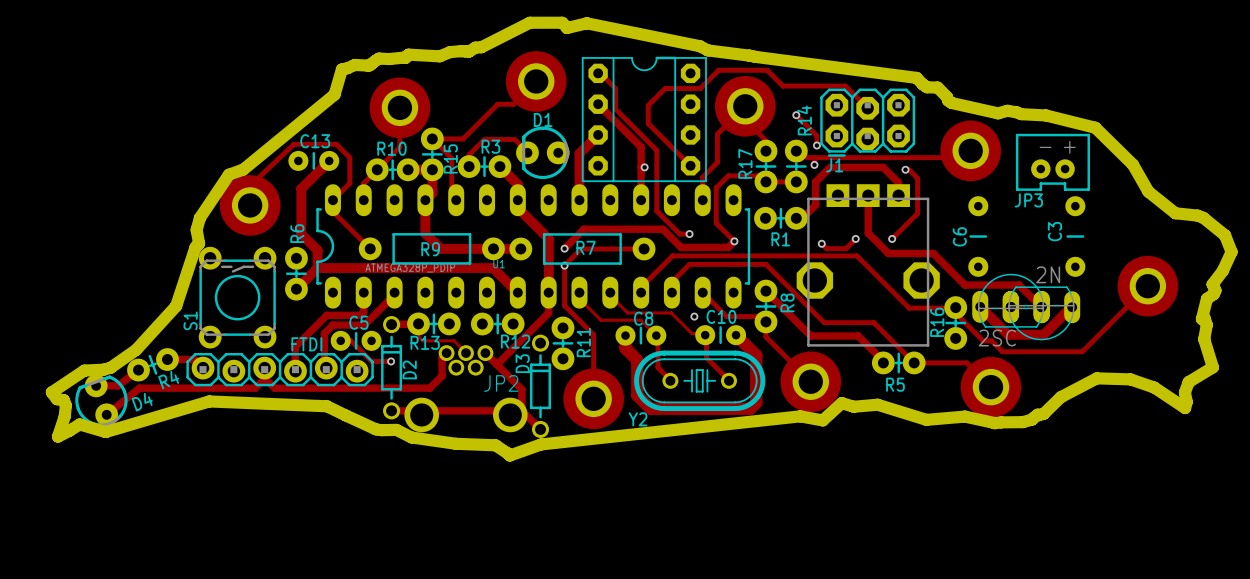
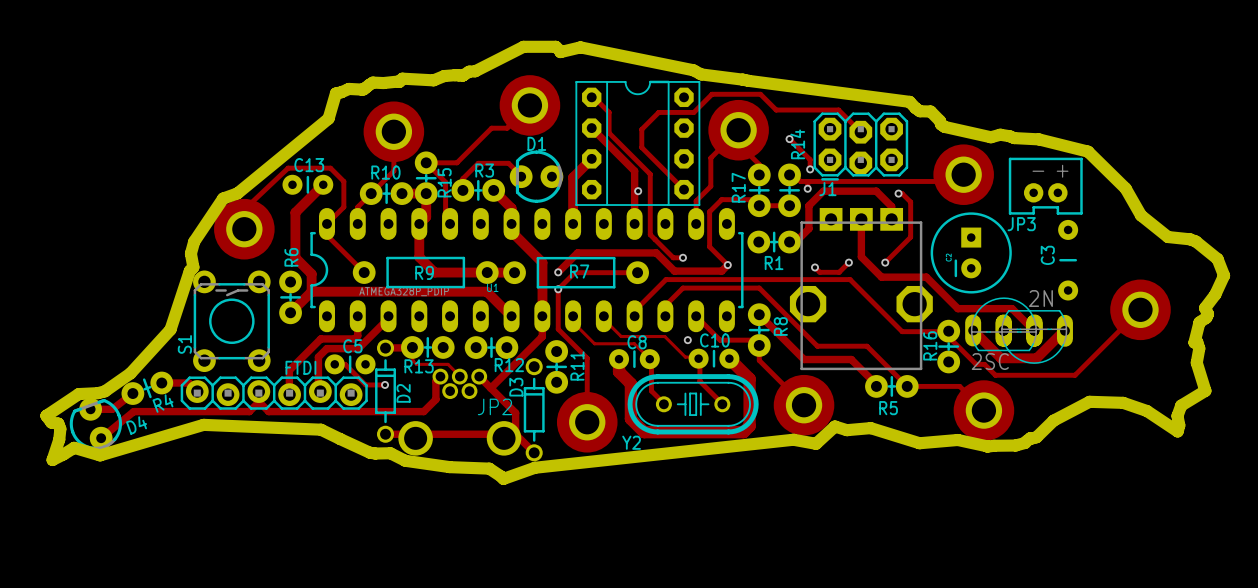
part: none -> (971, 252)
C6: (978, 236) -> none

